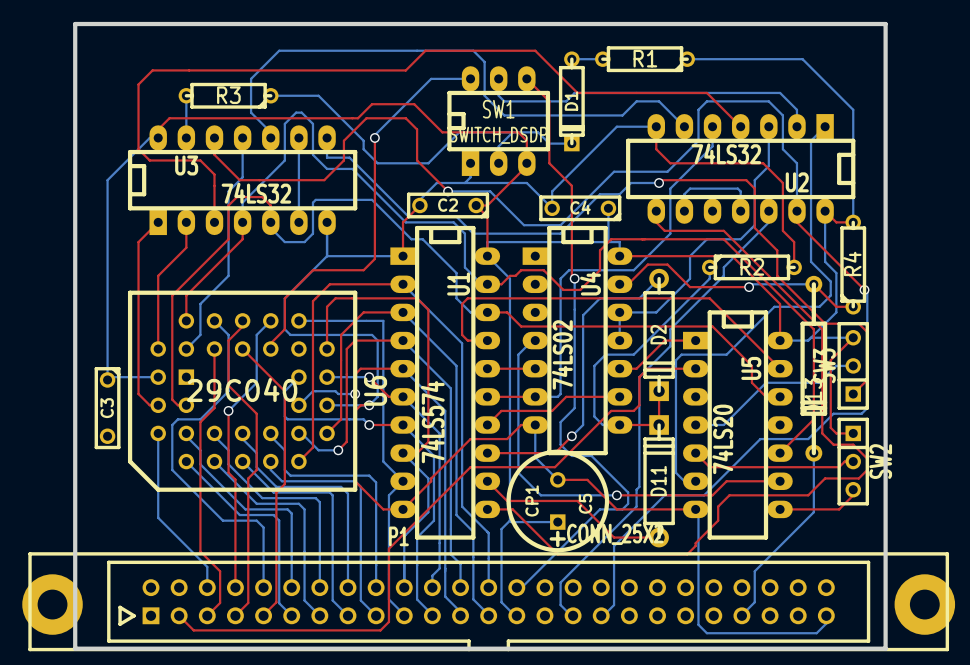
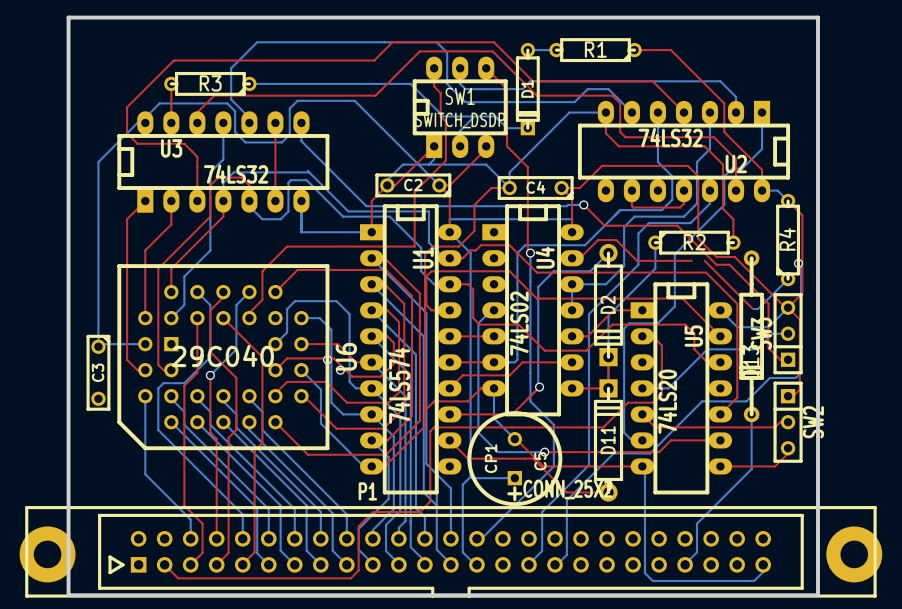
bottom track: (687, 59) (802, 59) (853, 109) (853, 222) -> none
top track: none -> (634, 50) (670, 50) (724, 103) (724, 132) (762, 169) (762, 190)
top track: (189, 70) (152, 70) (138, 84) (138, 121) -> (173, 60) (127, 107)
bottom track: (470, 78) (431, 78) (374, 135) (374, 137) -> none
bottom track: (186, 95) (186, 137) -> none
top track: none -> (171, 83) (171, 122)
bottom track: (318, 95) (363, 140) (363, 149) (377, 163) (428, 163) (459, 132) (538, 132) -> (293, 83) (410, 83) (443, 116) (496, 117)
bottom track: (825, 126) (811, 140) (811, 261) (830, 281) (830, 295) (819, 306) (774, 306) (726, 354) (712, 354) -> (762, 112) (762, 148) (742, 168) (732, 168) (724, 176) (724, 204) (674, 254) (674, 306) (657, 323)
top track: (158, 129) (169, 118) (358, 118) (372, 104) (414, 104) (442, 132) (518, 132) (526, 140) (526, 163) -> none
bottom track: none -> (145, 122) (145, 117) (159, 103) (227, 103) (235, 111) (235, 132) (245, 142) (281, 142) (289, 134) (289, 108) (297, 100) (354, 100) (439, 185)
top track: (214, 137) (214, 154) (239, 180) (324, 180) (343, 160) (343, 140) (366, 118) (405, 118) (417, 129) (417, 160) (448, 191) -> (197, 122) (197, 112) (214, 95) (375, 95) (419, 51) (492, 51) (536, 95) (612, 95) (620, 103) (620, 132) (625, 137) (713, 137) (736, 159) (736, 190)
bottom track: (298, 137) (298, 222) -> none
top track: none -> (275, 122) (275, 201)
top track: (374, 137) (374, 258) (363, 270) (311, 271) -> (434, 68) (434, 86) (440, 93) (440, 116) (445, 121) (445, 160) (414, 191) (414, 246) (287, 246)
via: (374, 137) -> none
bottom track: (712, 146) (670, 188) (670, 233) -> (657, 130) (657, 161) (672, 176) (672, 199) (661, 210) (618, 211)
bottom track: (327, 157) (349, 157) (408, 216) (456, 216) (473, 233) (560, 233) (599, 194) (619, 194) (630, 182) (659, 182) -> (301, 141) (366, 206) (583, 204)
top track: none -> (434, 146) (395, 185) (387, 185)
top track: (659, 182) (661, 180) (746, 180) (754, 188) (754, 228) (777, 250) (777, 275) (825, 323) (858, 323) (867, 332) (867, 379) (853, 394) -> none
via position: (659, 182) -> (583, 204)
bottom track: (253, 191) (284, 160) (284, 123) (296, 112) (301, 112) (312, 123) (312, 154) (327, 168) (352, 168) (405, 222) (453, 222) (464, 233) -> (307, 171) (348, 211) (428, 211)
bottom track: none -> (233, 172) (309, 172)
bottom track: (448, 191) (490, 191) (524, 225) (560, 225) (614, 171) (667, 171) (698, 140) (698, 109) (706, 101) (768, 101) (782, 115) (782, 149) (796, 163) (796, 197) -> none
via: (448, 191) -> none
bottom track: (332, 199) (372, 199) (411, 239) -> (306, 180) (343, 216) (379, 216)
top track: none -> (509, 188) (491, 188) (474, 204) (474, 230) (458, 246) (432, 246) (425, 254) (425, 426) (384, 466) (371, 466)
bottom track: (608, 208) (608, 242) -> none
top track: (656, 211) (656, 222) (664, 230) (723, 230) (756, 263) -> none
bottom track: (684, 211) (684, 194) (690, 188) (737, 188) (740, 191) (740, 211) -> none
top track: none -> (631, 190) (633, 207) (680, 207) (683, 203) (683, 190)
top track: (796, 211) (796, 222) (864, 289) -> none
bottom track: (825, 211) (825, 261) (836, 273) (836, 312) (808, 340) (780, 340) -> (762, 190) (777, 190) (788, 201)
top track: (825, 211) (836, 222) (853, 222) -> (788, 307) (802, 293) (802, 215) (788, 201)
bottom track: (768, 222) (723, 267) (723, 275) (670, 329) (670, 346) (639, 377) (639, 486) (636, 489) (636, 506) (560, 582) (560, 605) (573, 615) -> (710, 201) (710, 203) (690, 223) (648, 223) (638, 233) (638, 264) (589, 314) (589, 465) (542, 511) (542, 551) (528, 564)
bottom track: (706, 239) (690, 256) (690, 278) (675, 292) -> (652, 216) (634, 216) (624, 227) (624, 266)
top track: (733, 249) (723, 239) (611, 239) (599, 250) (599, 270) (580, 289) (563, 289) (543, 270) -> (677, 225) (604, 225) (583, 204)
bottom track: (327, 256) (284, 298) (284, 329) (290, 334) (372, 334) (377, 340) (377, 396) (369, 405) (327, 405) -> (371, 466) (363, 466) (320, 423) (320, 389) (301, 370)
top track: (619, 256) (732, 256) (763, 287) -> (572, 232) (572, 198) (561, 188) (579, 188) (602, 165) (687, 165) (698, 176) (698, 238)
top track: none -> (501, 245) (509, 245) (536, 272) (706, 272) (737, 303) (737, 397)
bottom track: (709, 278) (633, 354) (605, 354) (594, 365) (594, 416) (602, 424) (619, 424) -> (655, 253) (655, 268) (608, 315) (608, 388)
top track: (775, 282) (822, 329) (822, 433) (833, 444) (853, 444) (867, 458) (867, 470) (858, 478) (825, 478) (808, 495) (729, 495) (718, 506) (718, 520) (687, 554) (557, 554) (512, 509) (487, 509) -> (716, 256) (734, 256) (785, 307) (788, 307)
top track: (403, 284) (329, 284) (312, 301) (312, 447) (298, 461) -> (371, 258) (384, 258) (419, 293) (419, 420) (386, 454) (307, 454) (275, 422)
bottom track: (813, 284) (751, 284) (749, 287) -> none
top track: (813, 284) (836, 306) (853, 306) -> none
via: (749, 287) -> none
top track: (775, 291) (813, 329) (813, 419) (798, 434) -> (716, 264) (729, 264) (768, 303) (768, 348) (780, 359) (788, 359)
top track: (552, 298) (709, 298) (739, 327) -> (509, 271) (536, 298) (682, 298)
top track: (780, 303) (780, 340) -> (720, 276) (752, 309)
bottom track: none -> (788, 279) (758, 309) (752, 309)
top track: (403, 312) (363, 312) (341, 334) (341, 419) (327, 433) -> (371, 284) (384, 284) (404, 303) (404, 407) (383, 428) (336, 428) (304, 396) (301, 396)
top track: (512, 318) (521, 326) (712, 326) (742, 356) -> (473, 289) (473, 318) (479, 324) (518, 324) (544, 350) (586, 350) (612, 324) (685, 324)
bottom track: (298, 320) (383, 320) (383, 461) (403, 481) (388, 495) (388, 576) -> (371, 440) (388, 457) (388, 498) (358, 528)
top track: none -> (275, 292) (297, 269) (386, 269) (412, 296) (412, 415) (387, 440) (371, 440)
bottom track: (811, 337) (853, 337) -> (720, 310) (737, 327) (768, 327) (788, 307)
top track: (853, 337) (830, 360) (830, 427) (836, 433) (853, 433) -> (788, 307) (799, 319) (799, 389) (793, 396) (788, 396)
top track: (403, 340) (355, 340) (346, 349) (346, 441) (338, 450) -> (371, 310) (387, 310) (399, 322) (399, 392) (388, 402) (346, 402) (326, 381) (287, 381) (275, 393) (275, 396)
bottom track: none -> (301, 318) (319, 318) (331, 329) (331, 402) (343, 414) (371, 414)
top track: (327, 349) (327, 306) (335, 298) (417, 298) (428, 309) (428, 441) (417, 453) (403, 453) -> none
bottom track: (456, 365) (456, 515) (473, 531) -> (421, 333) (423, 336) (423, 492) (436, 505)
top track: (403, 368) (360, 368) (355, 374) (355, 394) -> (371, 336) (387, 336) (393, 342) (393, 363) (380, 376) (352, 376) (333, 358) (287, 358) (275, 370)
top track: (695, 368) (647, 368) (639, 377) (639, 405) (633, 410) (611, 410) (554, 467) -> (642, 336) (652, 336) (661, 345) (661, 394) (654, 402) (628, 402) (603, 427) (512, 427)
bottom track: (298, 377) (284, 391) (284, 416) (287, 419) (363, 419) (369, 424) -> (275, 344) (287, 332) (287, 309) (294, 301) (336, 301) (349, 314) (349, 381) (356, 388) (371, 388)
bottom track: (327, 377) (369, 377) -> none
top track: (369, 377) (388, 396) -> (301, 344) (337, 344) (356, 362) (358, 362)
via: (369, 377) -> none
bottom track: (355, 394) (312, 391) (298, 405) -> none
top track: (369, 405) (360, 405) (355, 410) (355, 481) (383, 509) (403, 509) (460, 448) -> none
bottom track: (574, 408) (560, 422) (560, 444) (571, 455) (591, 455) -> (530, 372) (530, 401) (546, 417)
top track: none -> (539, 387) (527, 398)
top track: (369, 424) (403, 424) -> none
via: (369, 424) -> none
bottom track: (301, 433) (318, 450) (338, 450) -> none
via position: (571, 436) -> (539, 387)
via: (338, 450) -> none
bottom track: (599, 464) (628, 492) (628, 503) (622, 509) (599, 509) -> (553, 424) (553, 466)
top track: (466, 471) (388, 548) (388, 574) -> (430, 431) (430, 501) (419, 511) (373, 511) (358, 526)
bottom track: (290, 475) (369, 475) (376, 482) (376, 561) -> (267, 435) (346, 514)
bottom track: (426, 477) (428, 512) (404, 536) (404, 578) -> (393, 436) (393, 509) (372, 530)
top track: (559, 479) (587, 479) (616, 509) -> (516, 439) (543, 466) (569, 466)
bottom track: (282, 481) (355, 481) (360, 486) (360, 560) -> (259, 440) (332, 513)
bottom track: (276, 486) (341, 486) (347, 493) (347, 558) -> (254, 445) (320, 511)
bottom track: (273, 492) (329, 492) (332, 495) (332, 600) -> (252, 450) (306, 505) (306, 550)
bottom track: (539, 493) (616, 495) -> (497, 452) (544, 452)
top track: (713, 493) (616, 495) -> (659, 452) (544, 452)
via position: (616, 495) -> (544, 452)
bottom track: (262, 498) (315, 498) (319, 502) (319, 555) -> (241, 456) (294, 509)
bottom track: (256, 503) (298, 503) (304, 509) (304, 551) -> (236, 461) (280, 505)
bottom track: (245, 509) (287, 509) (291, 513) (291, 555) -> (242, 483) (268, 509)
bottom track: (239, 515) (273, 515) (279, 520) (279, 554) -> (220, 471) (257, 508)
bottom track: (222, 520) (256, 520) -> (225, 466) (236, 476)
bottom track: (433, 520) (417, 537) (418, 600) -> (400, 476) (400, 510) (386, 525) (386, 551)
bottom track: (263, 527) (263, 561) -> (205, 476) (242, 514)

